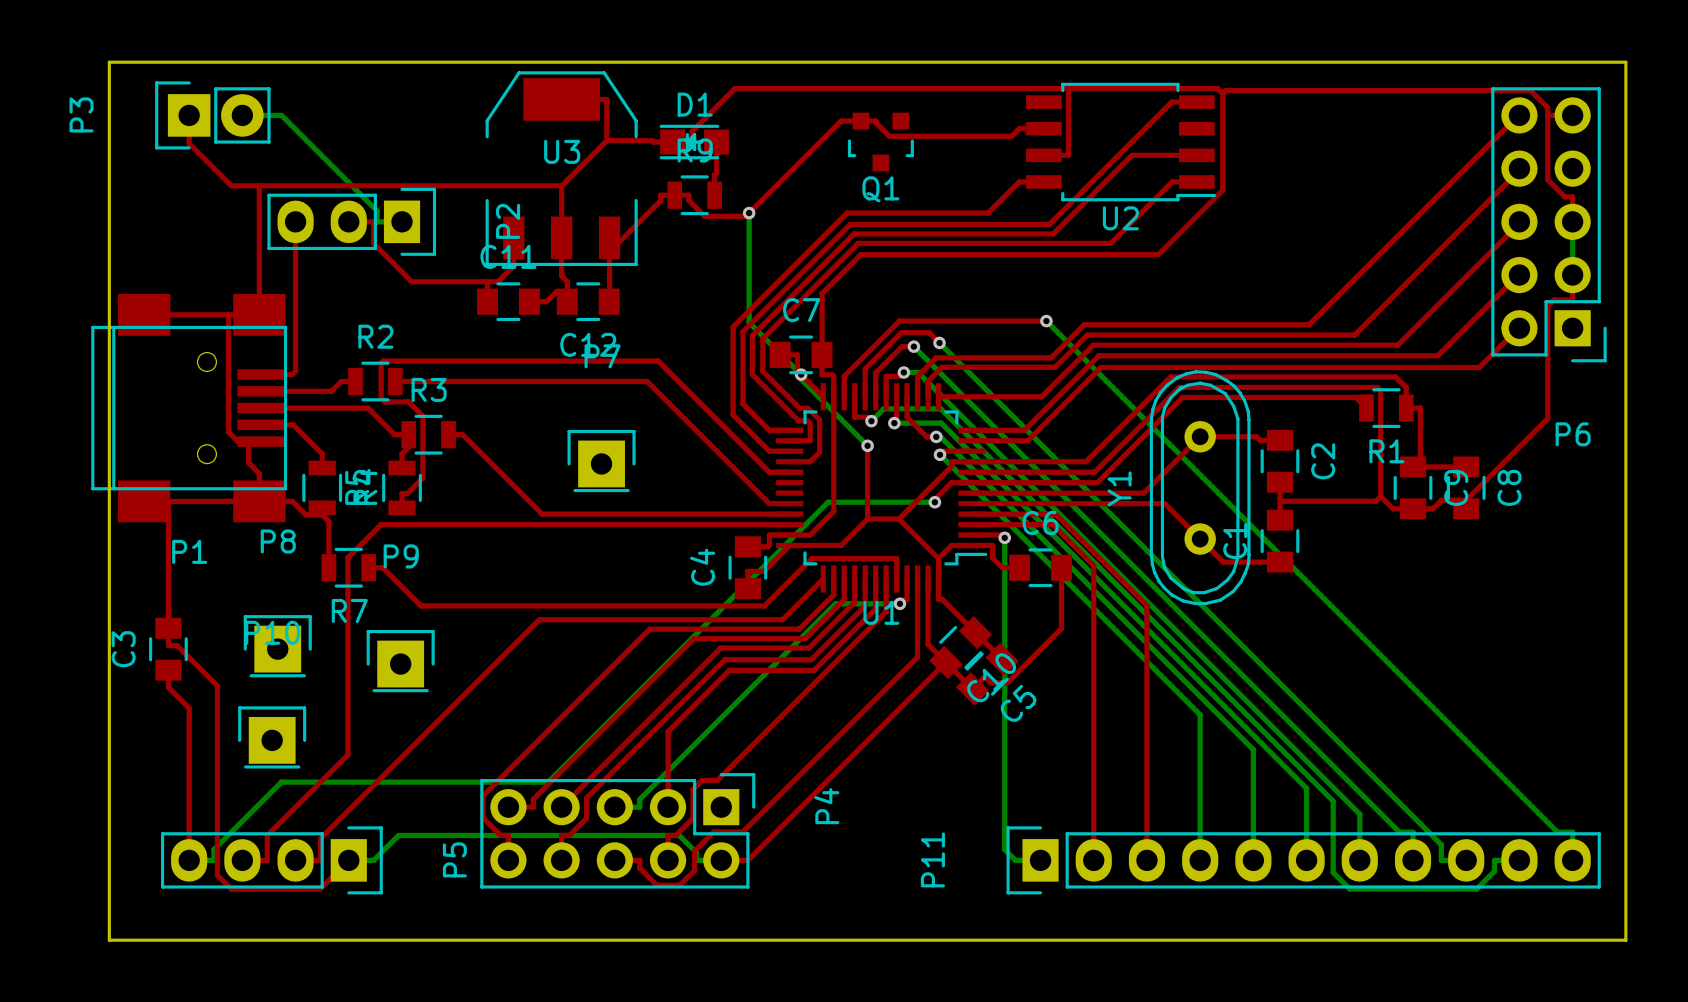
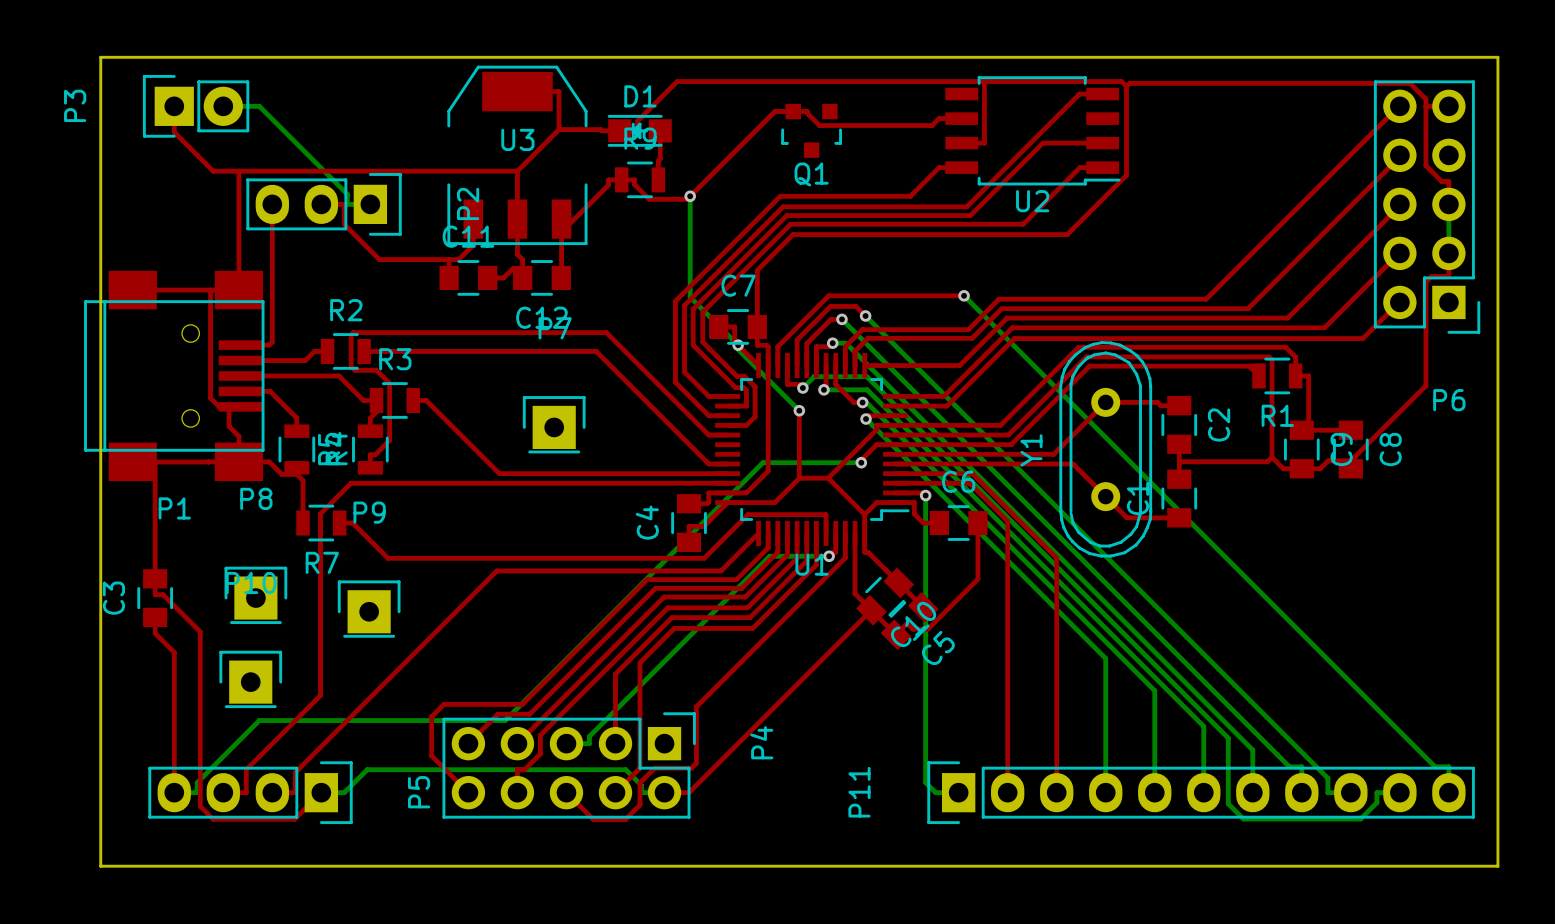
top track: (917, 605) (917, 657) (742, 832) (713, 832) (694, 851) -> (845, 557) (696, 706) (696, 763) (691, 768) (654, 768) (640, 784)
top track: (886, 611) (717, 780) (702, 780) (692, 789) (692, 818) (675, 835) (668, 835) (668, 860) -> (816, 563) (752, 628) (674, 628) (640, 662) (640, 768) (615, 792)
top track: (702, 629) (649, 629) (483, 795) (483, 817) (500, 835) (508, 835) (508, 860) -> (647, 579) (522, 704) (443, 704) (431, 716) (431, 755) (468, 792)
top track: (711, 638) (694, 638) (533, 799) (533, 807) (508, 807) -> (655, 588) (529, 714) (497, 714) (468, 743)
top track: (614, 860) (639, 860) (639, 868) (656, 885) (679, 885) (694, 870) -> (566, 792) (593, 819) (625, 819) (640, 804) (640, 801)

